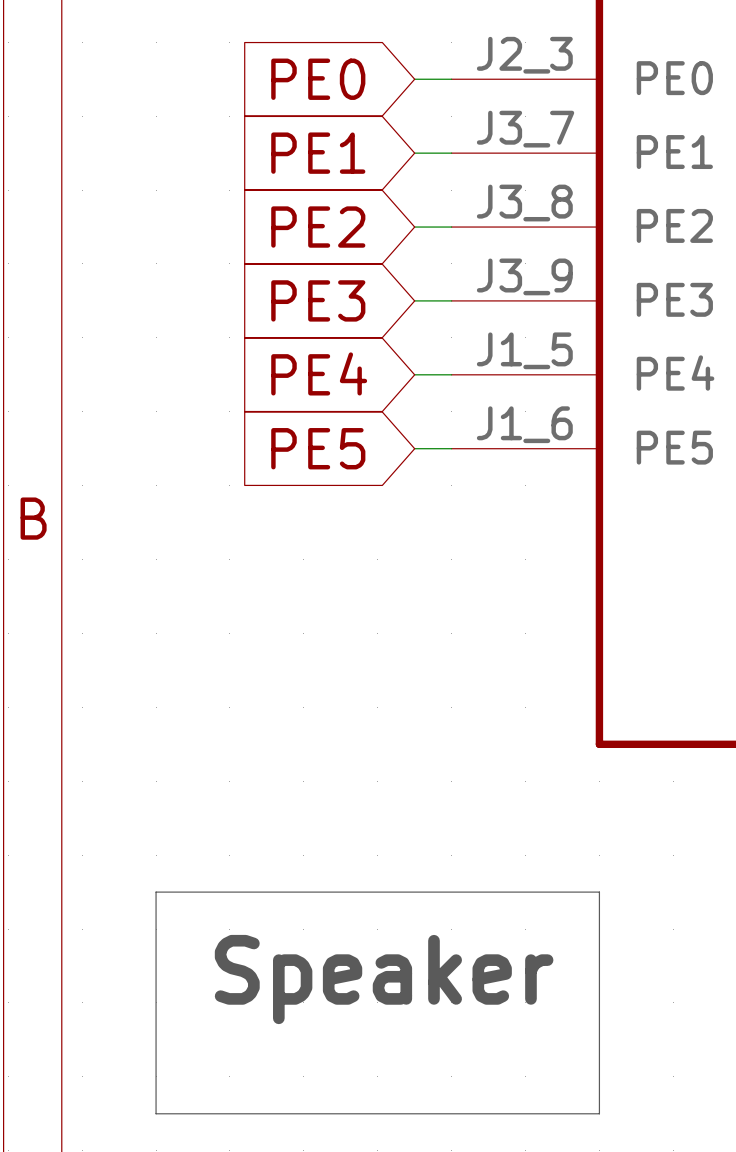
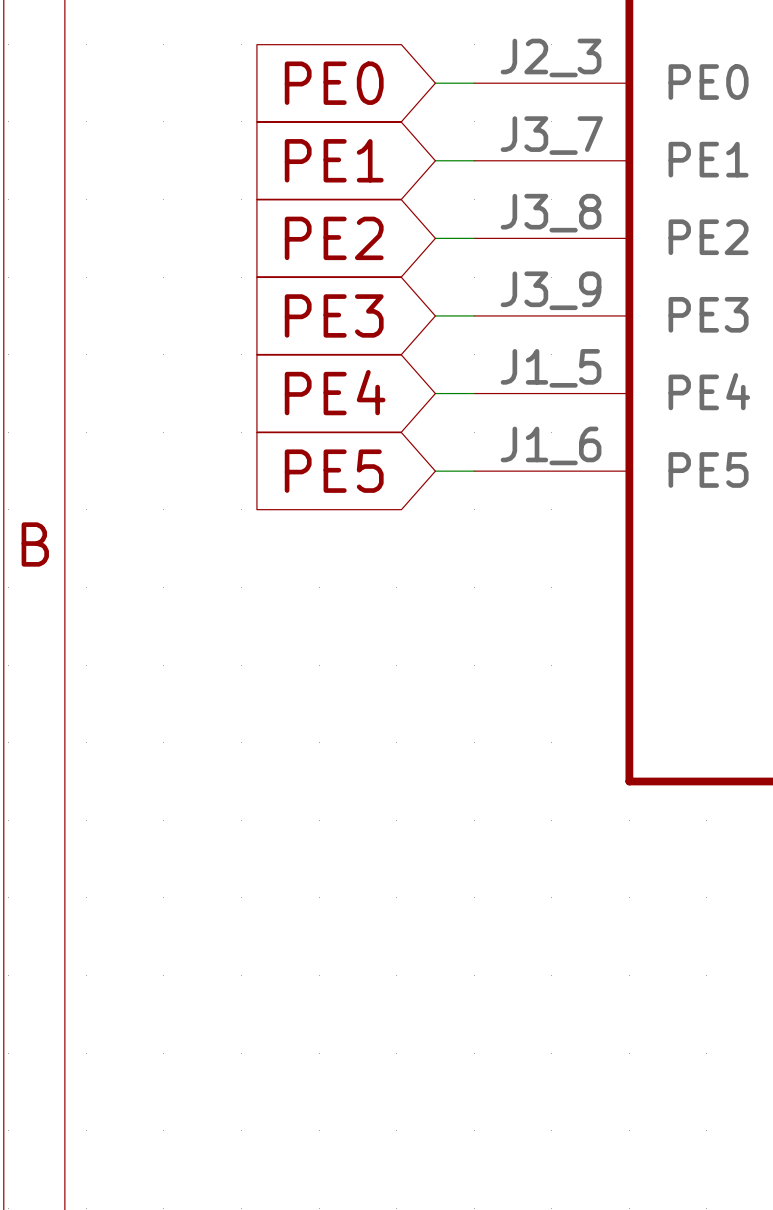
line: (156, 892) (599, 892) (599, 1113) (156, 1113) (156, 892) -> none
text: Speaker (384, 979) -> none

